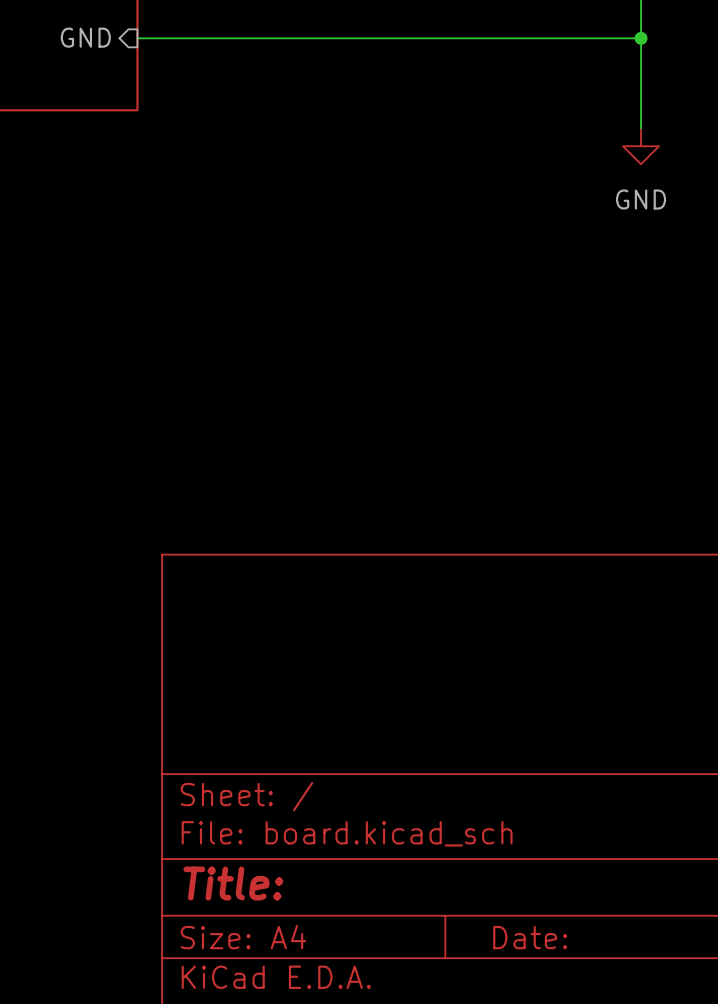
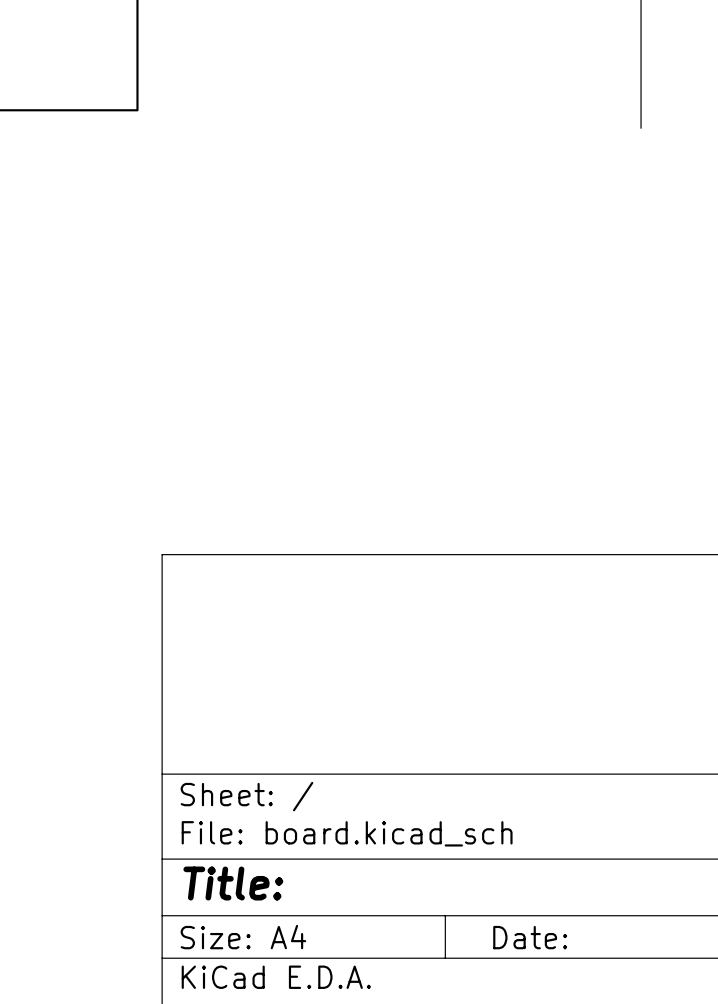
sheet pin: GND (85, 37) -> none
wire: (137, 38) (641, 38) -> none
junction: (641, 38) -> none
power symbol: GND (641, 146) -> none

